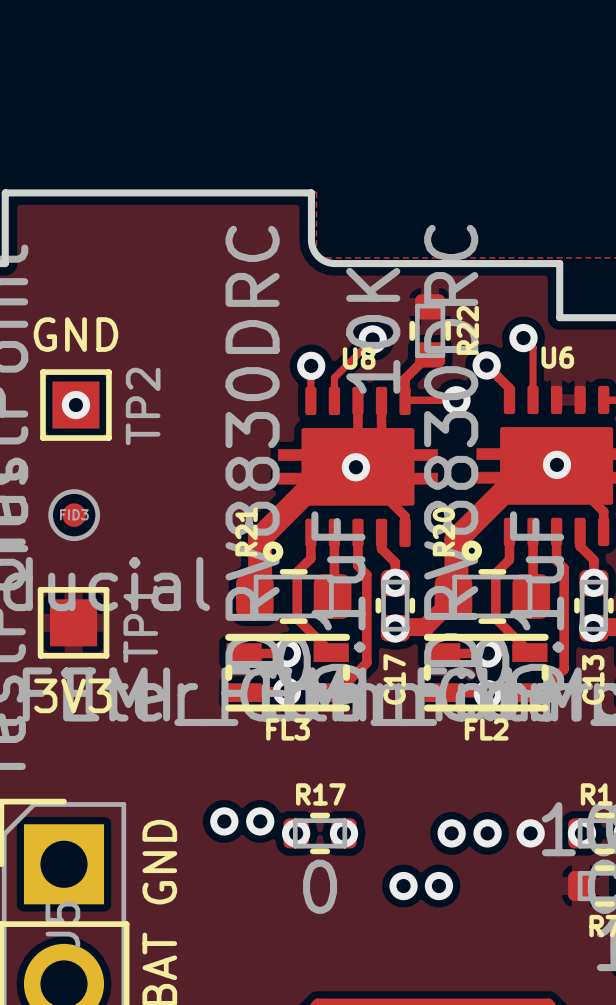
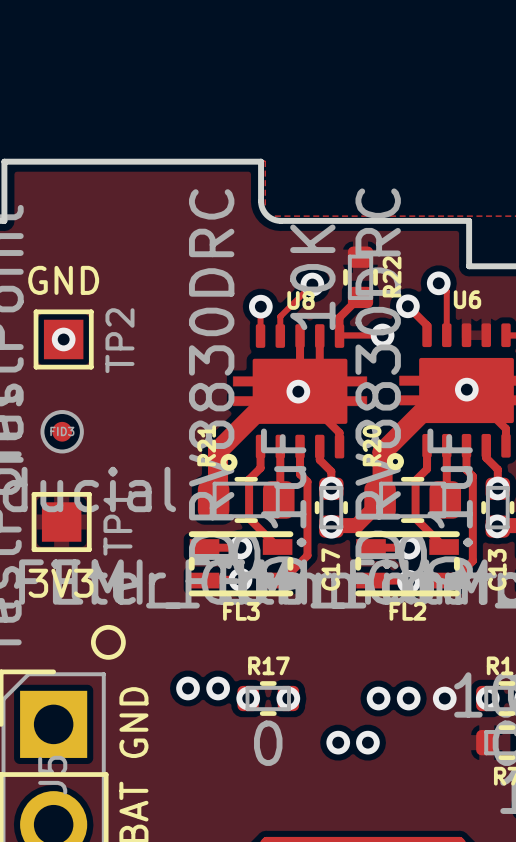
part: none -> (108, 642)

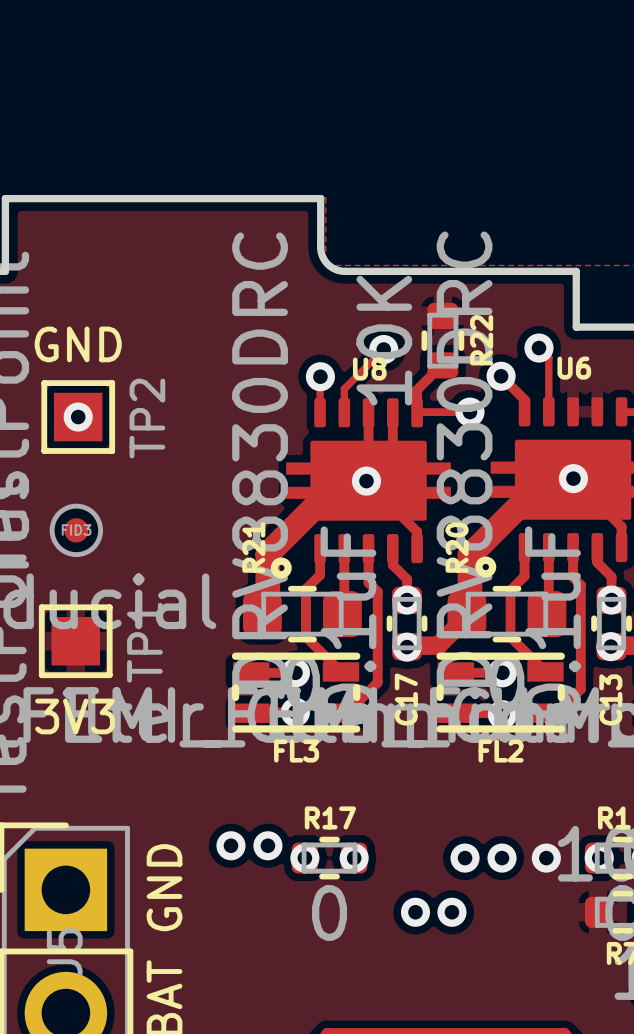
part: (108, 642) -> none

